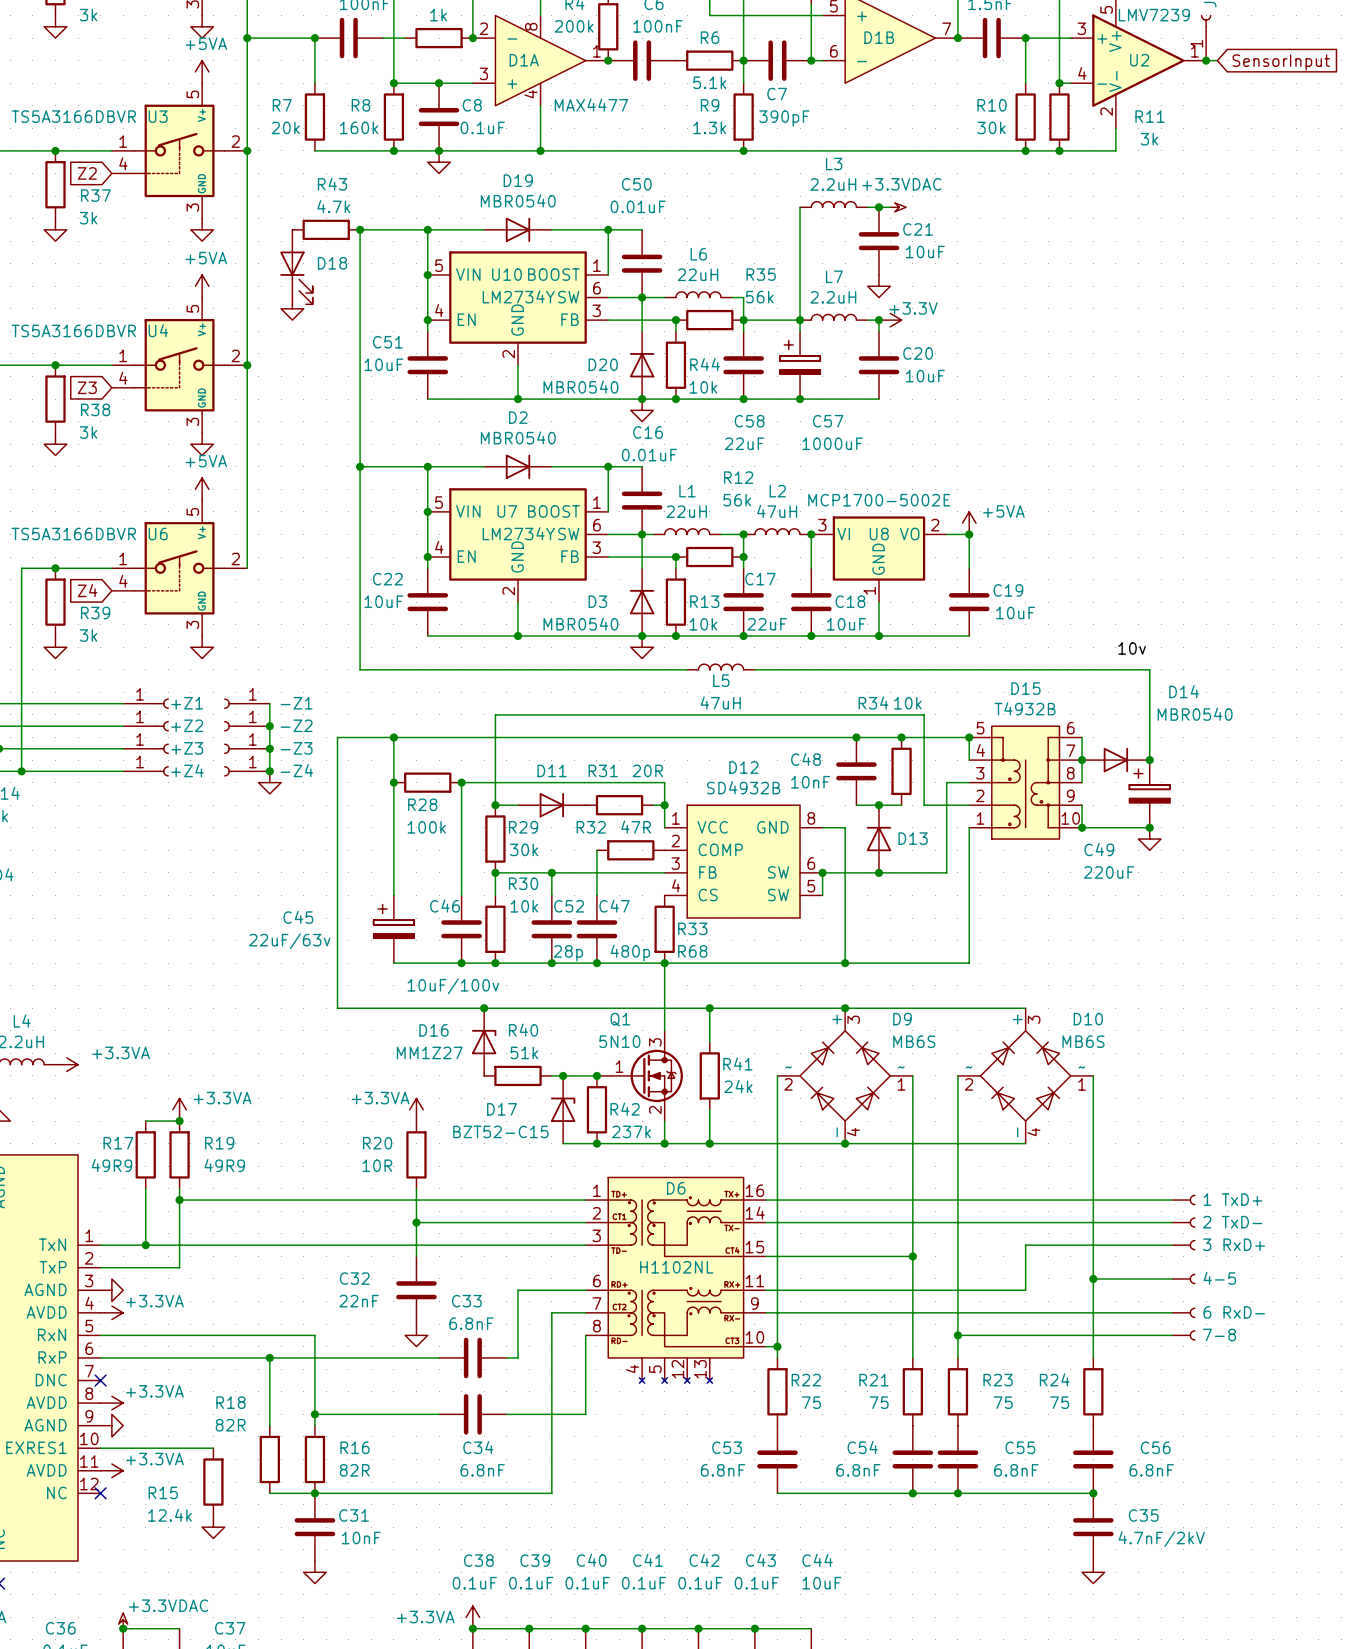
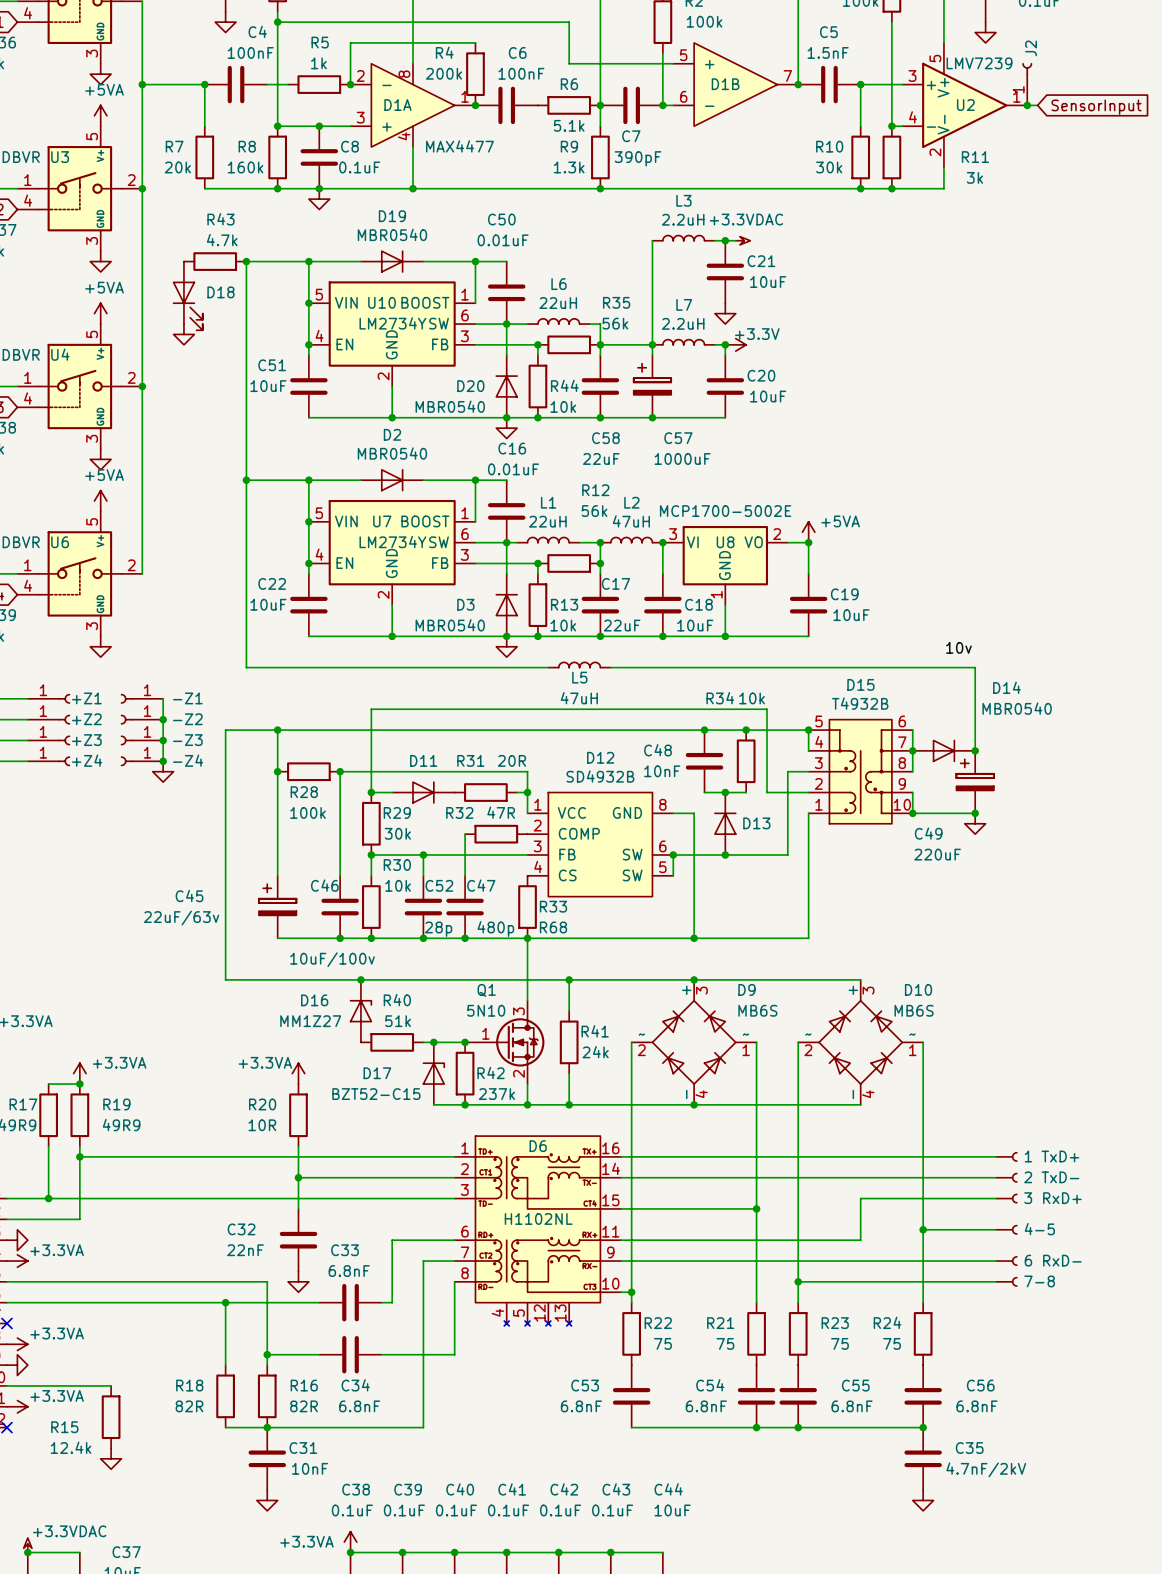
wire: (314, 1335) (314, 1425) -> (204, 1281) (267, 1281) (267, 1365)
wire: (269, 1357) (269, 1425) -> (225, 1302) (225, 1365)
junction: (269, 1357) -> none
junction: none -> (225, 1302)
R18 name position: R18 (230, 1402) -> R18 (189, 1385)
wire: (314, 1414) (382, 1414) -> none
junction: (314, 1414) -> none
junction: none -> (267, 1354)
R18 value position: 82R (230, 1425) -> 82R (189, 1406)
R18 position: (269, 1459) -> (225, 1396)
R16 position: (314, 1459) -> (267, 1396)
wire: (269, 1493) (337, 1493) -> none
junction: (314, 1493) -> none
junction: none -> (267, 1427)
C31 position: (314, 1527) -> (267, 1458)
power symbol position: (314, 1572) -> (267, 1500)

